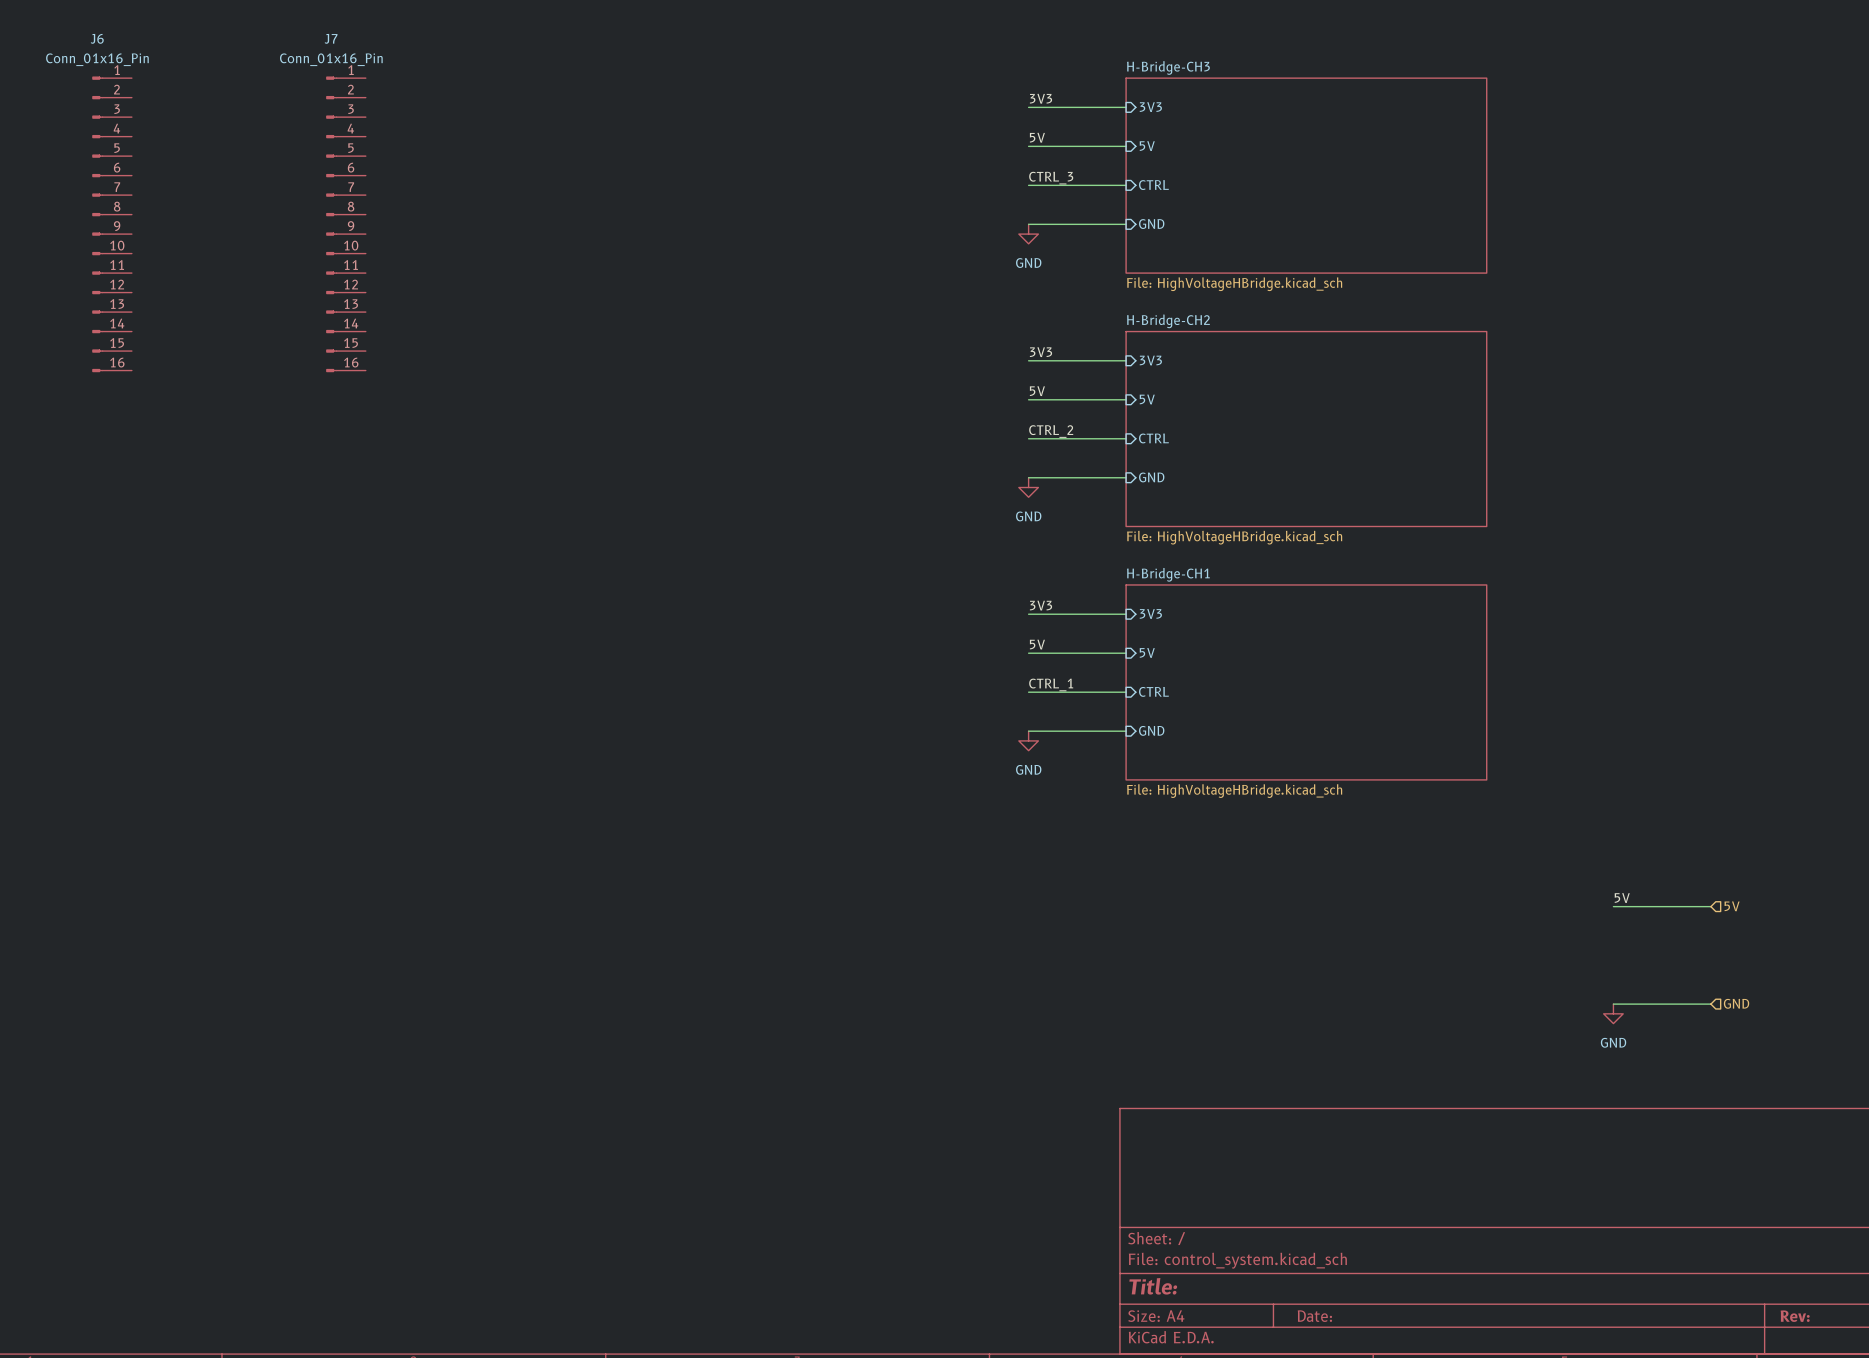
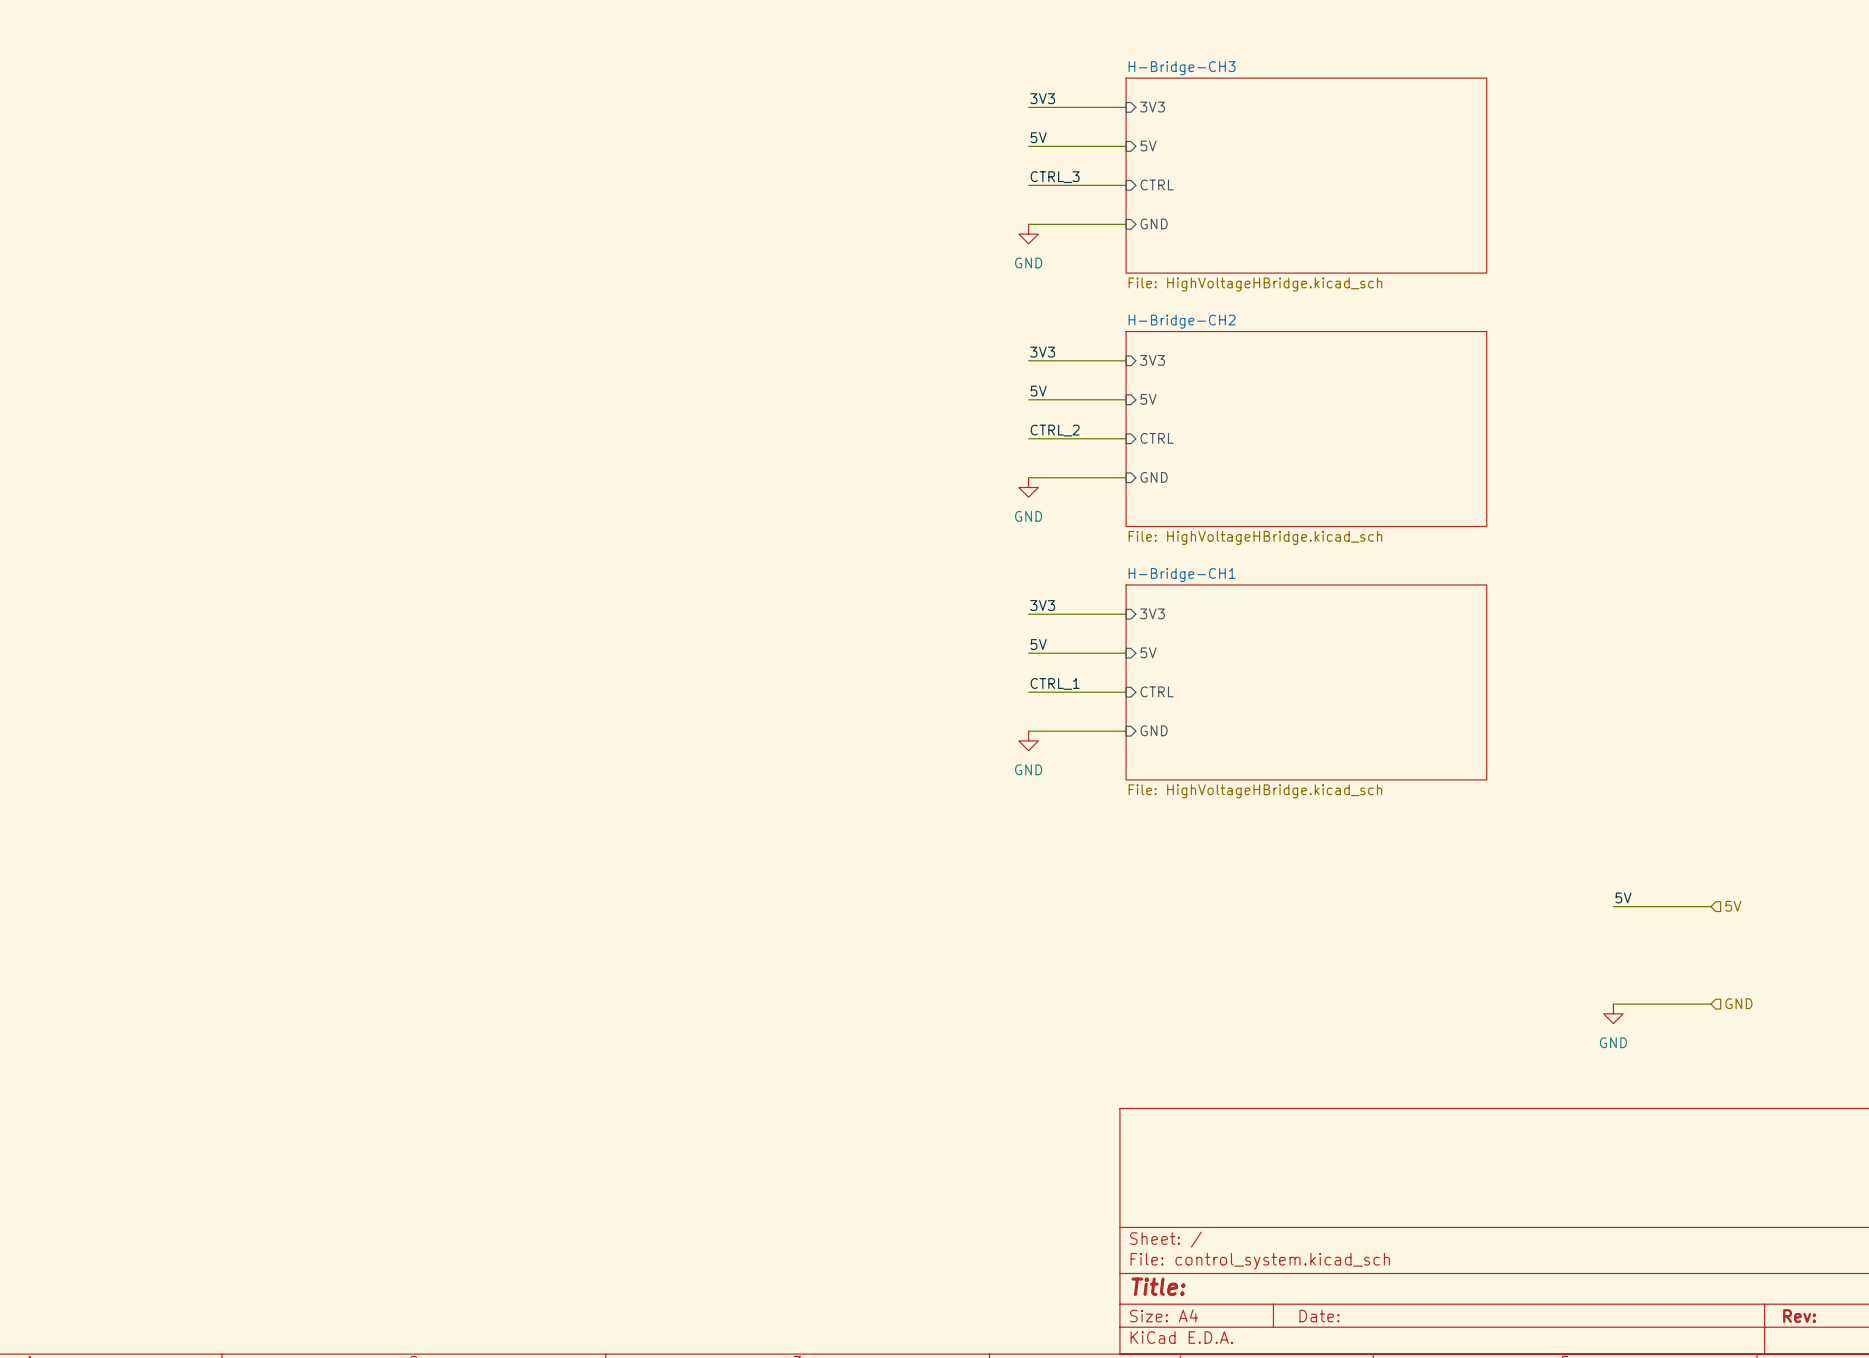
J6: Conn_01x16_Pin (112, 224) -> none
J7: Conn_01x16_Pin (346, 224) -> none

